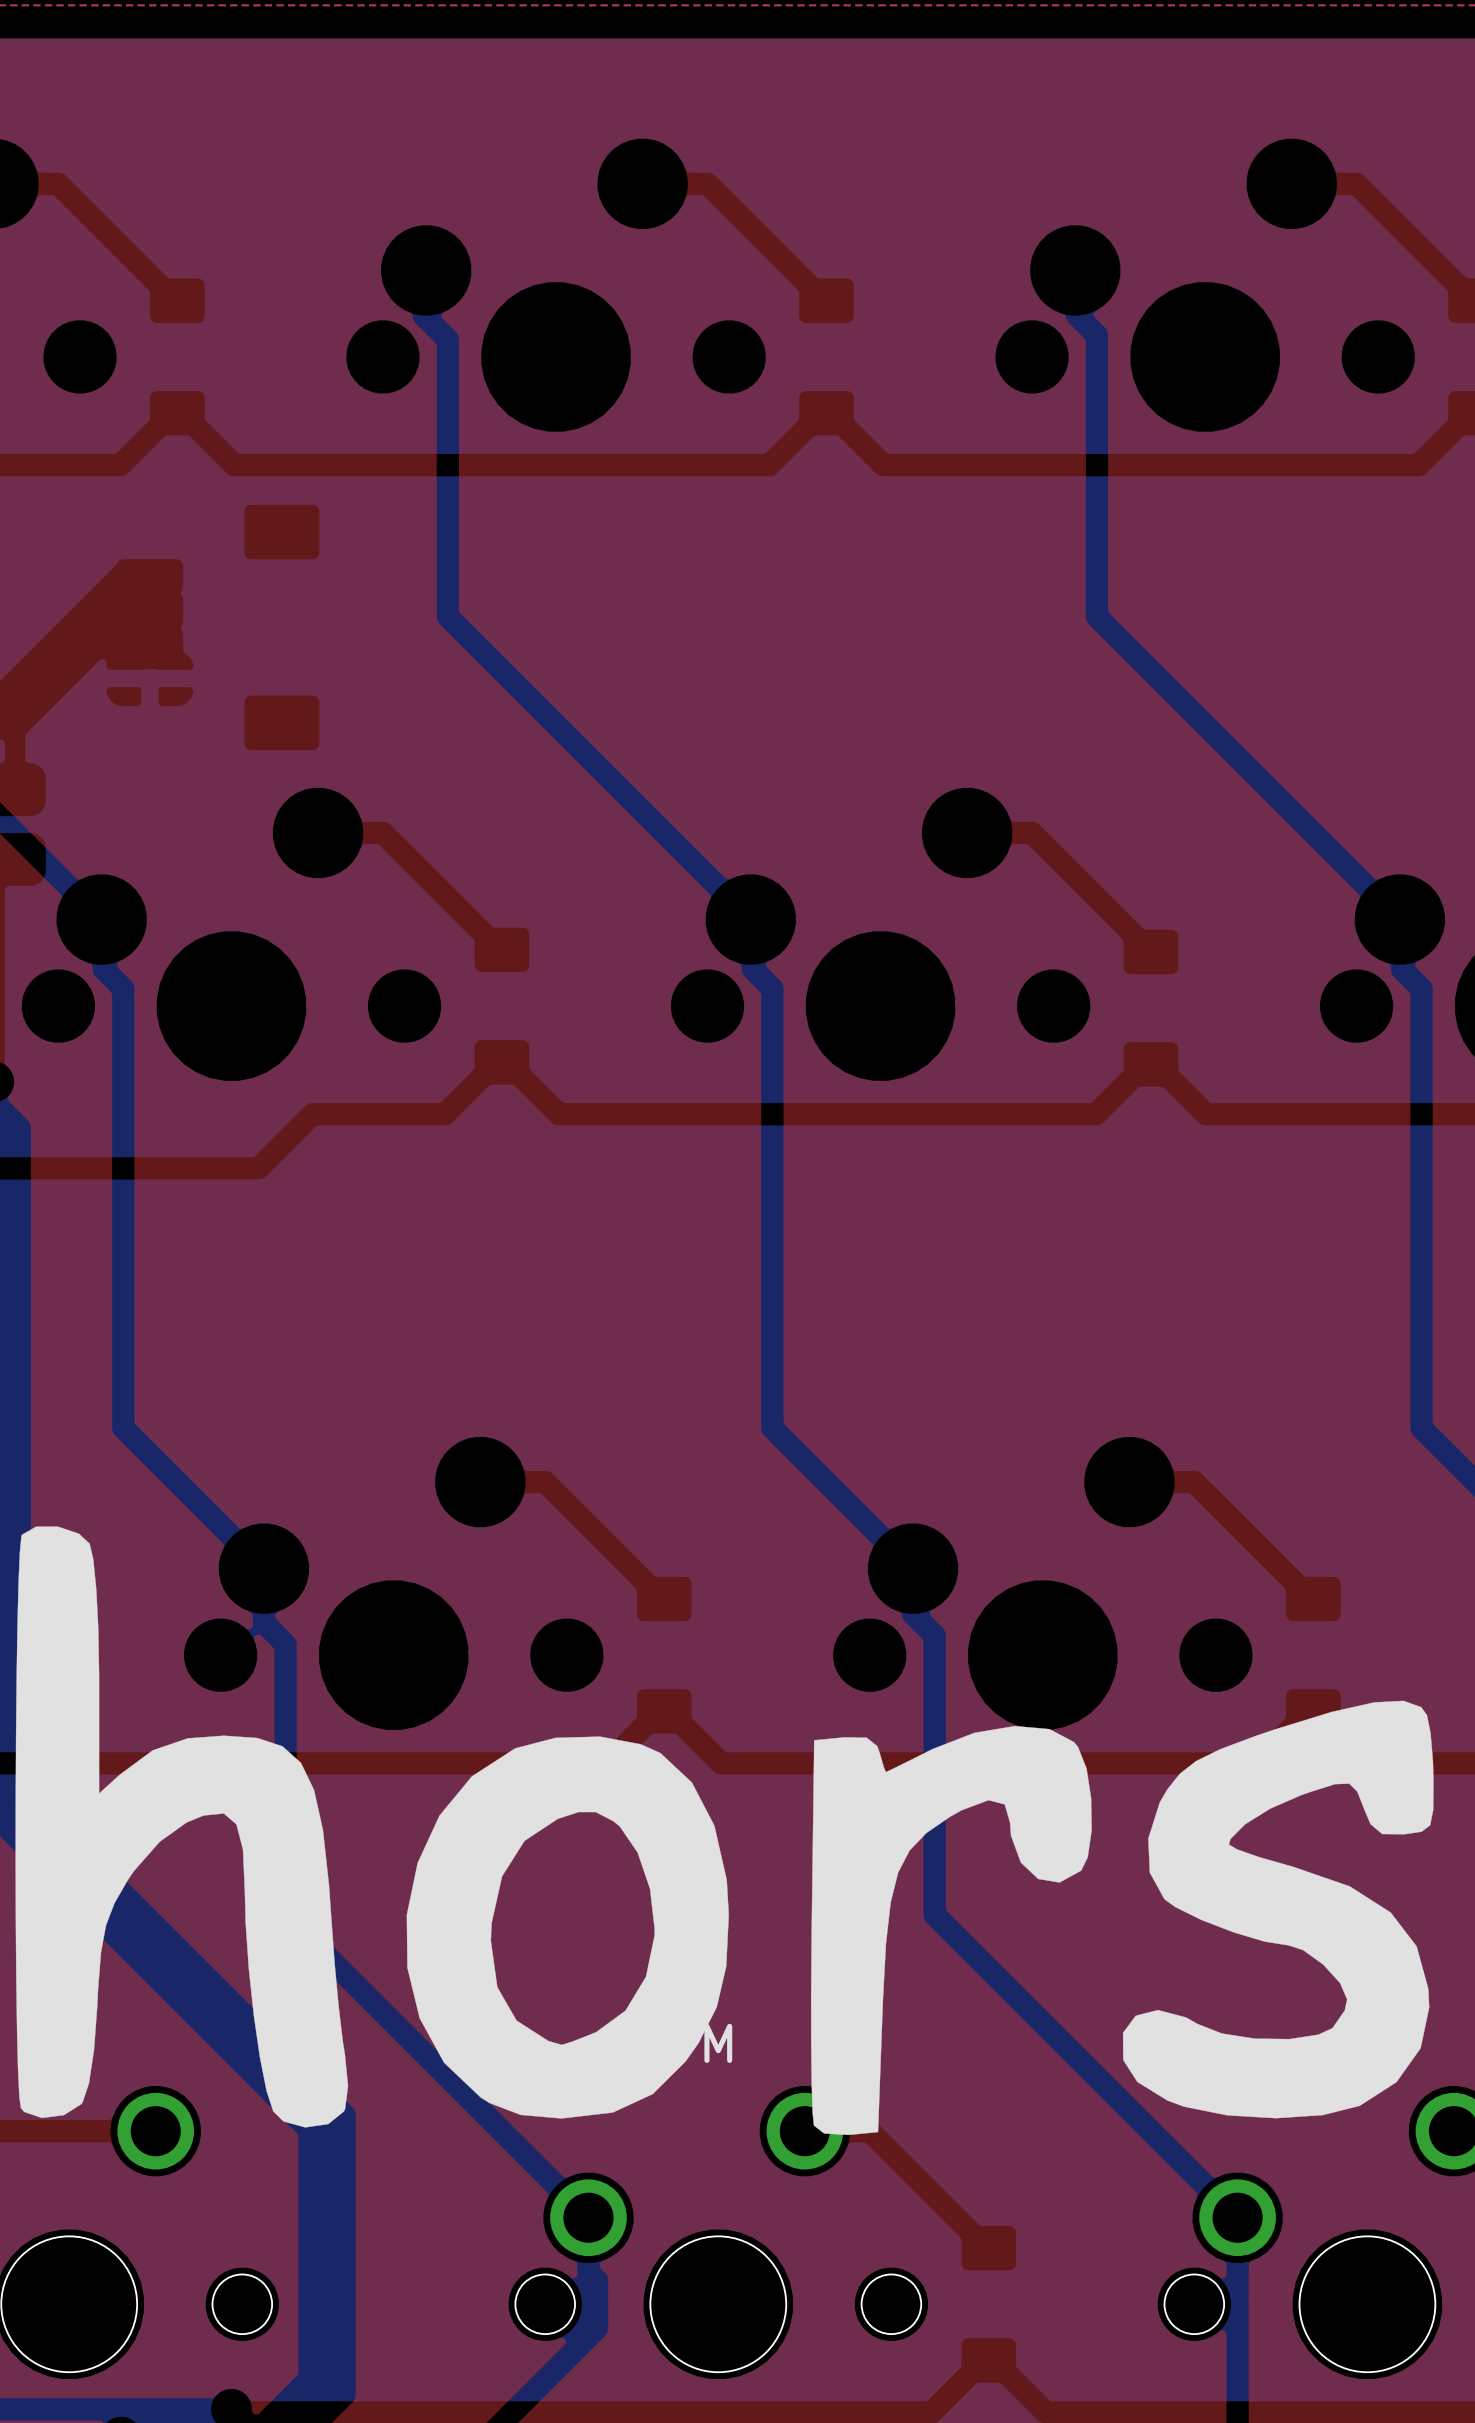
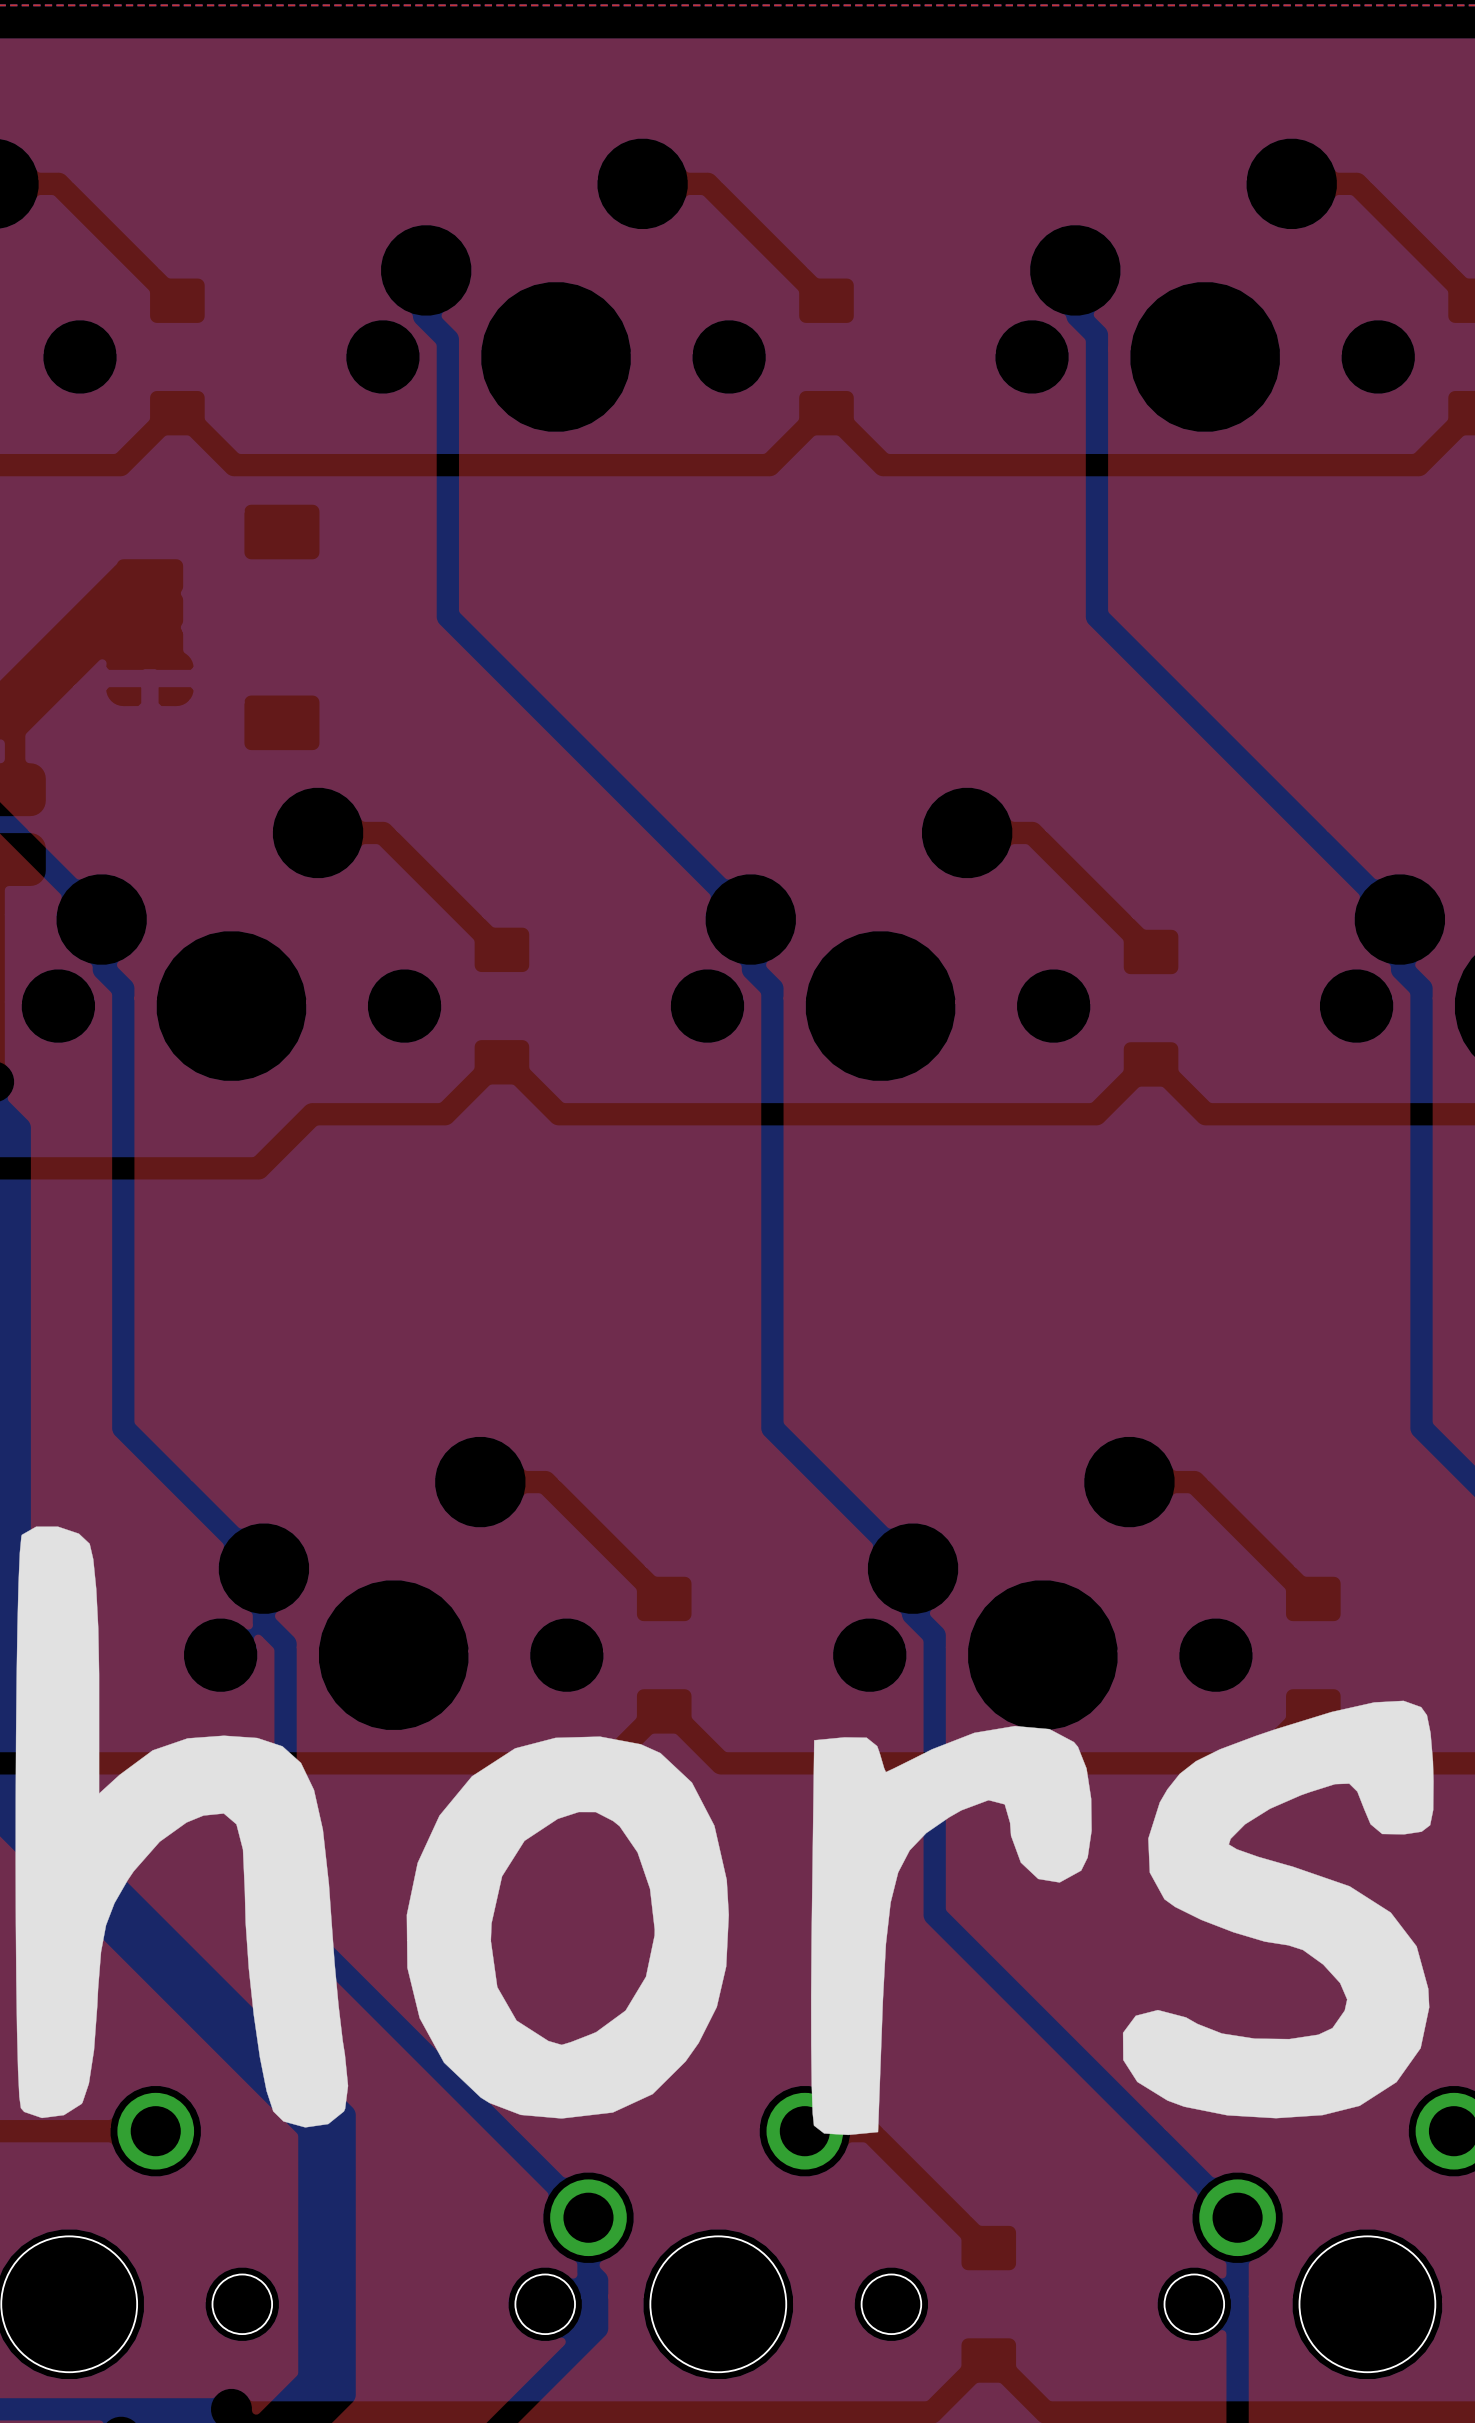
part value: M (718, 2043) -> none

